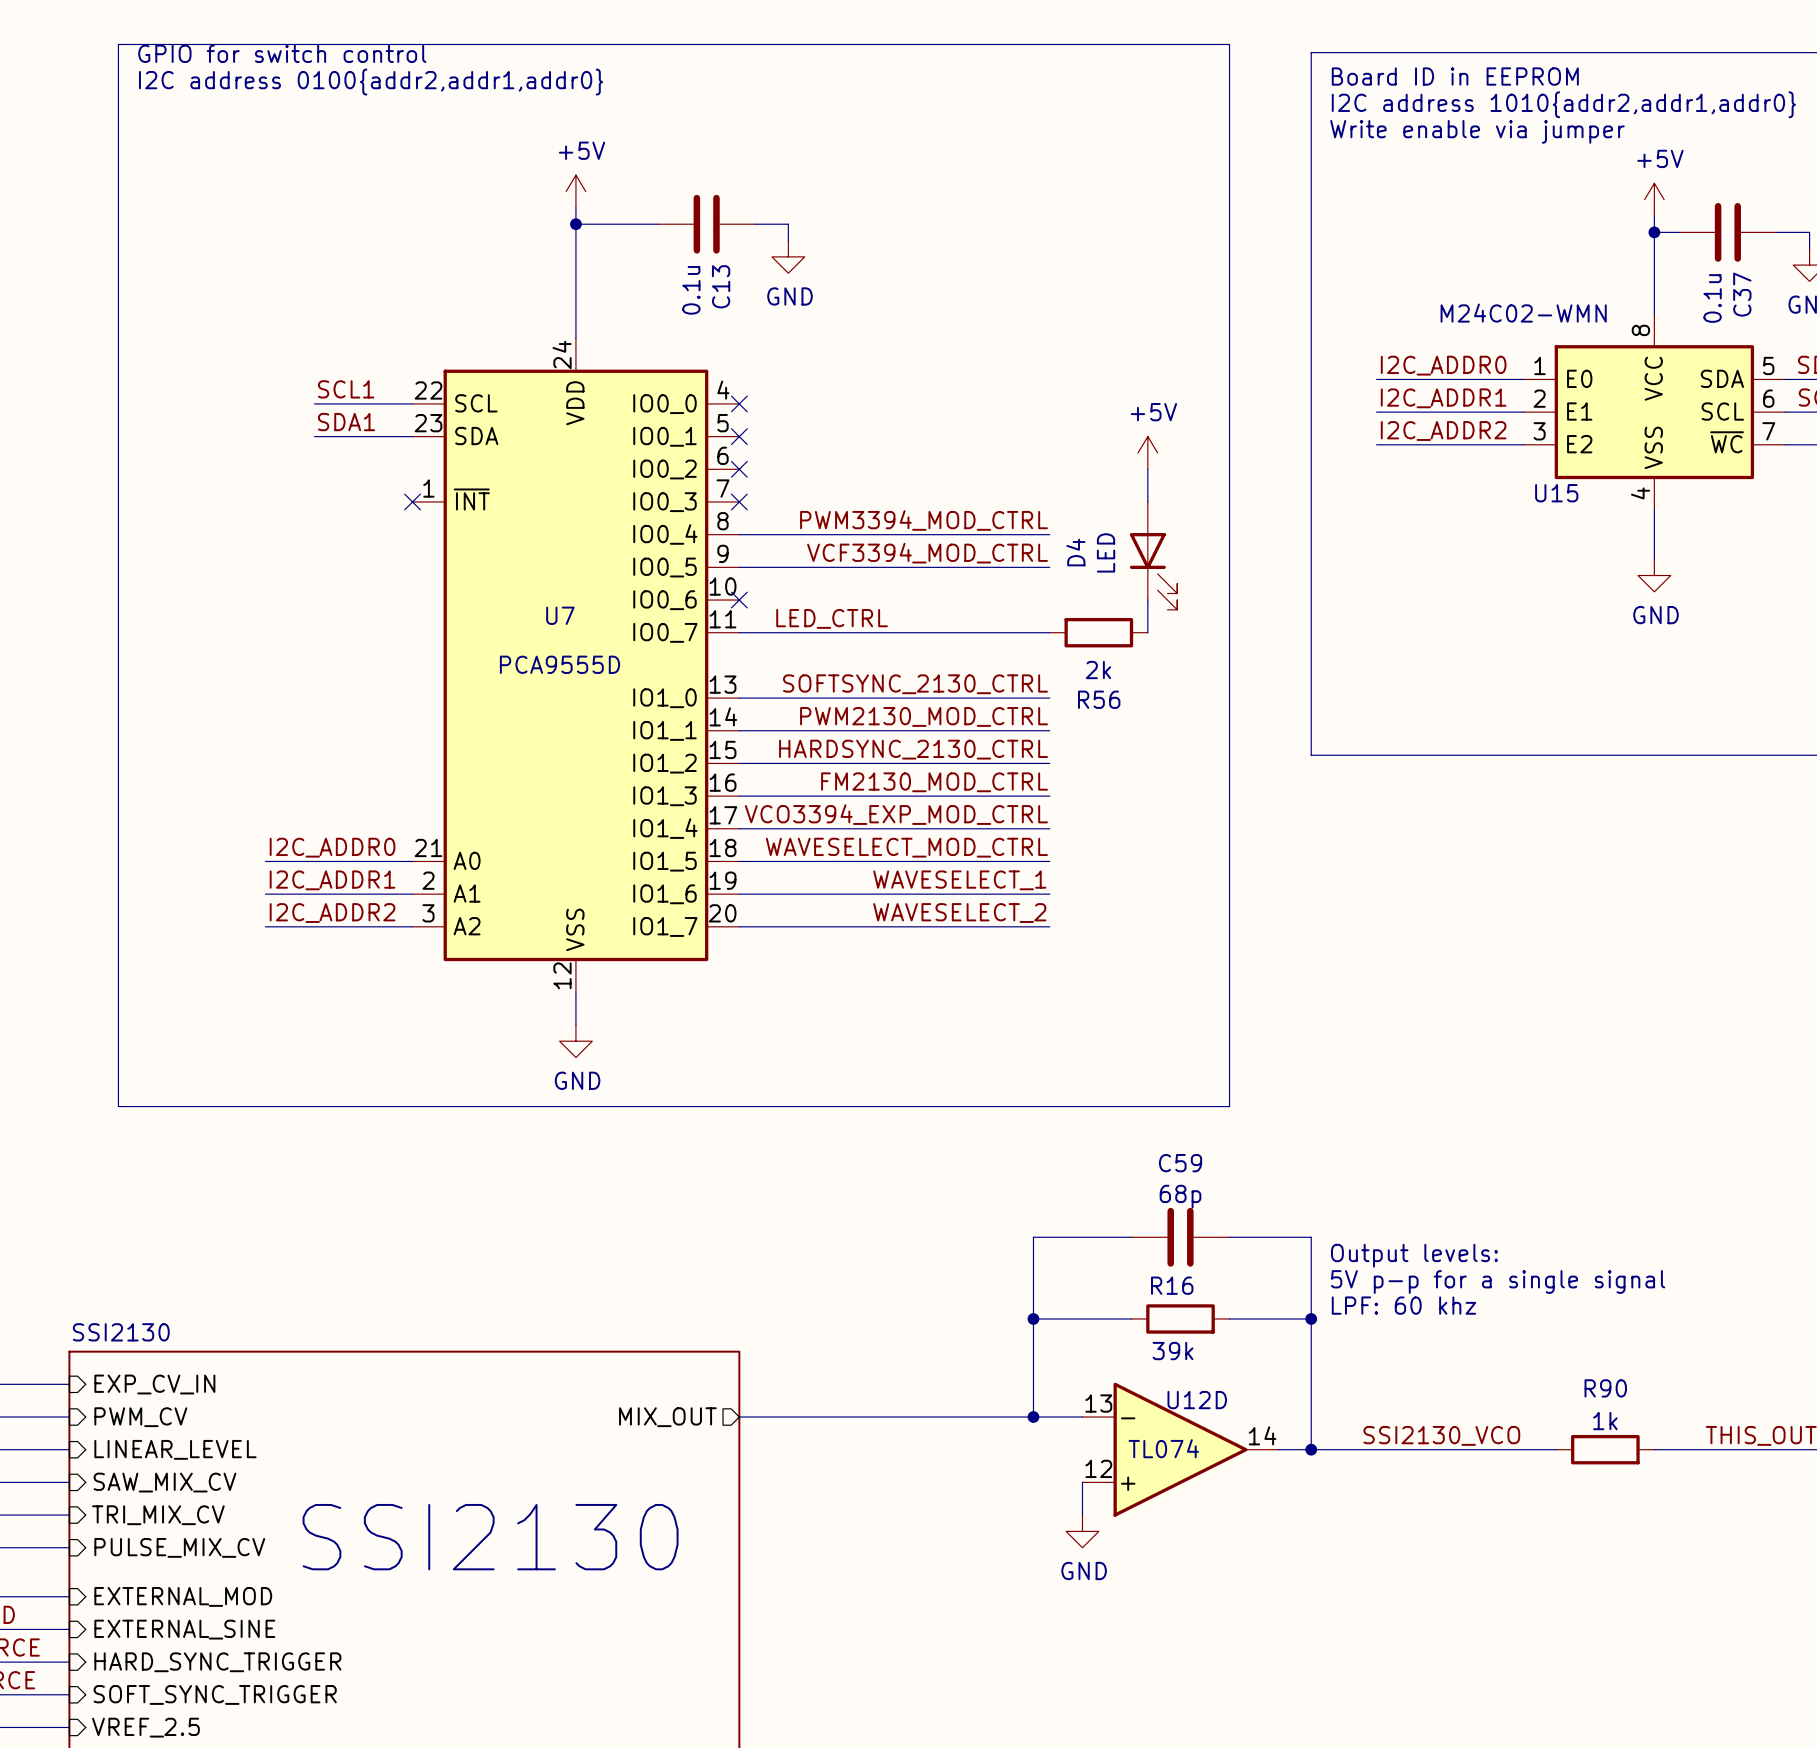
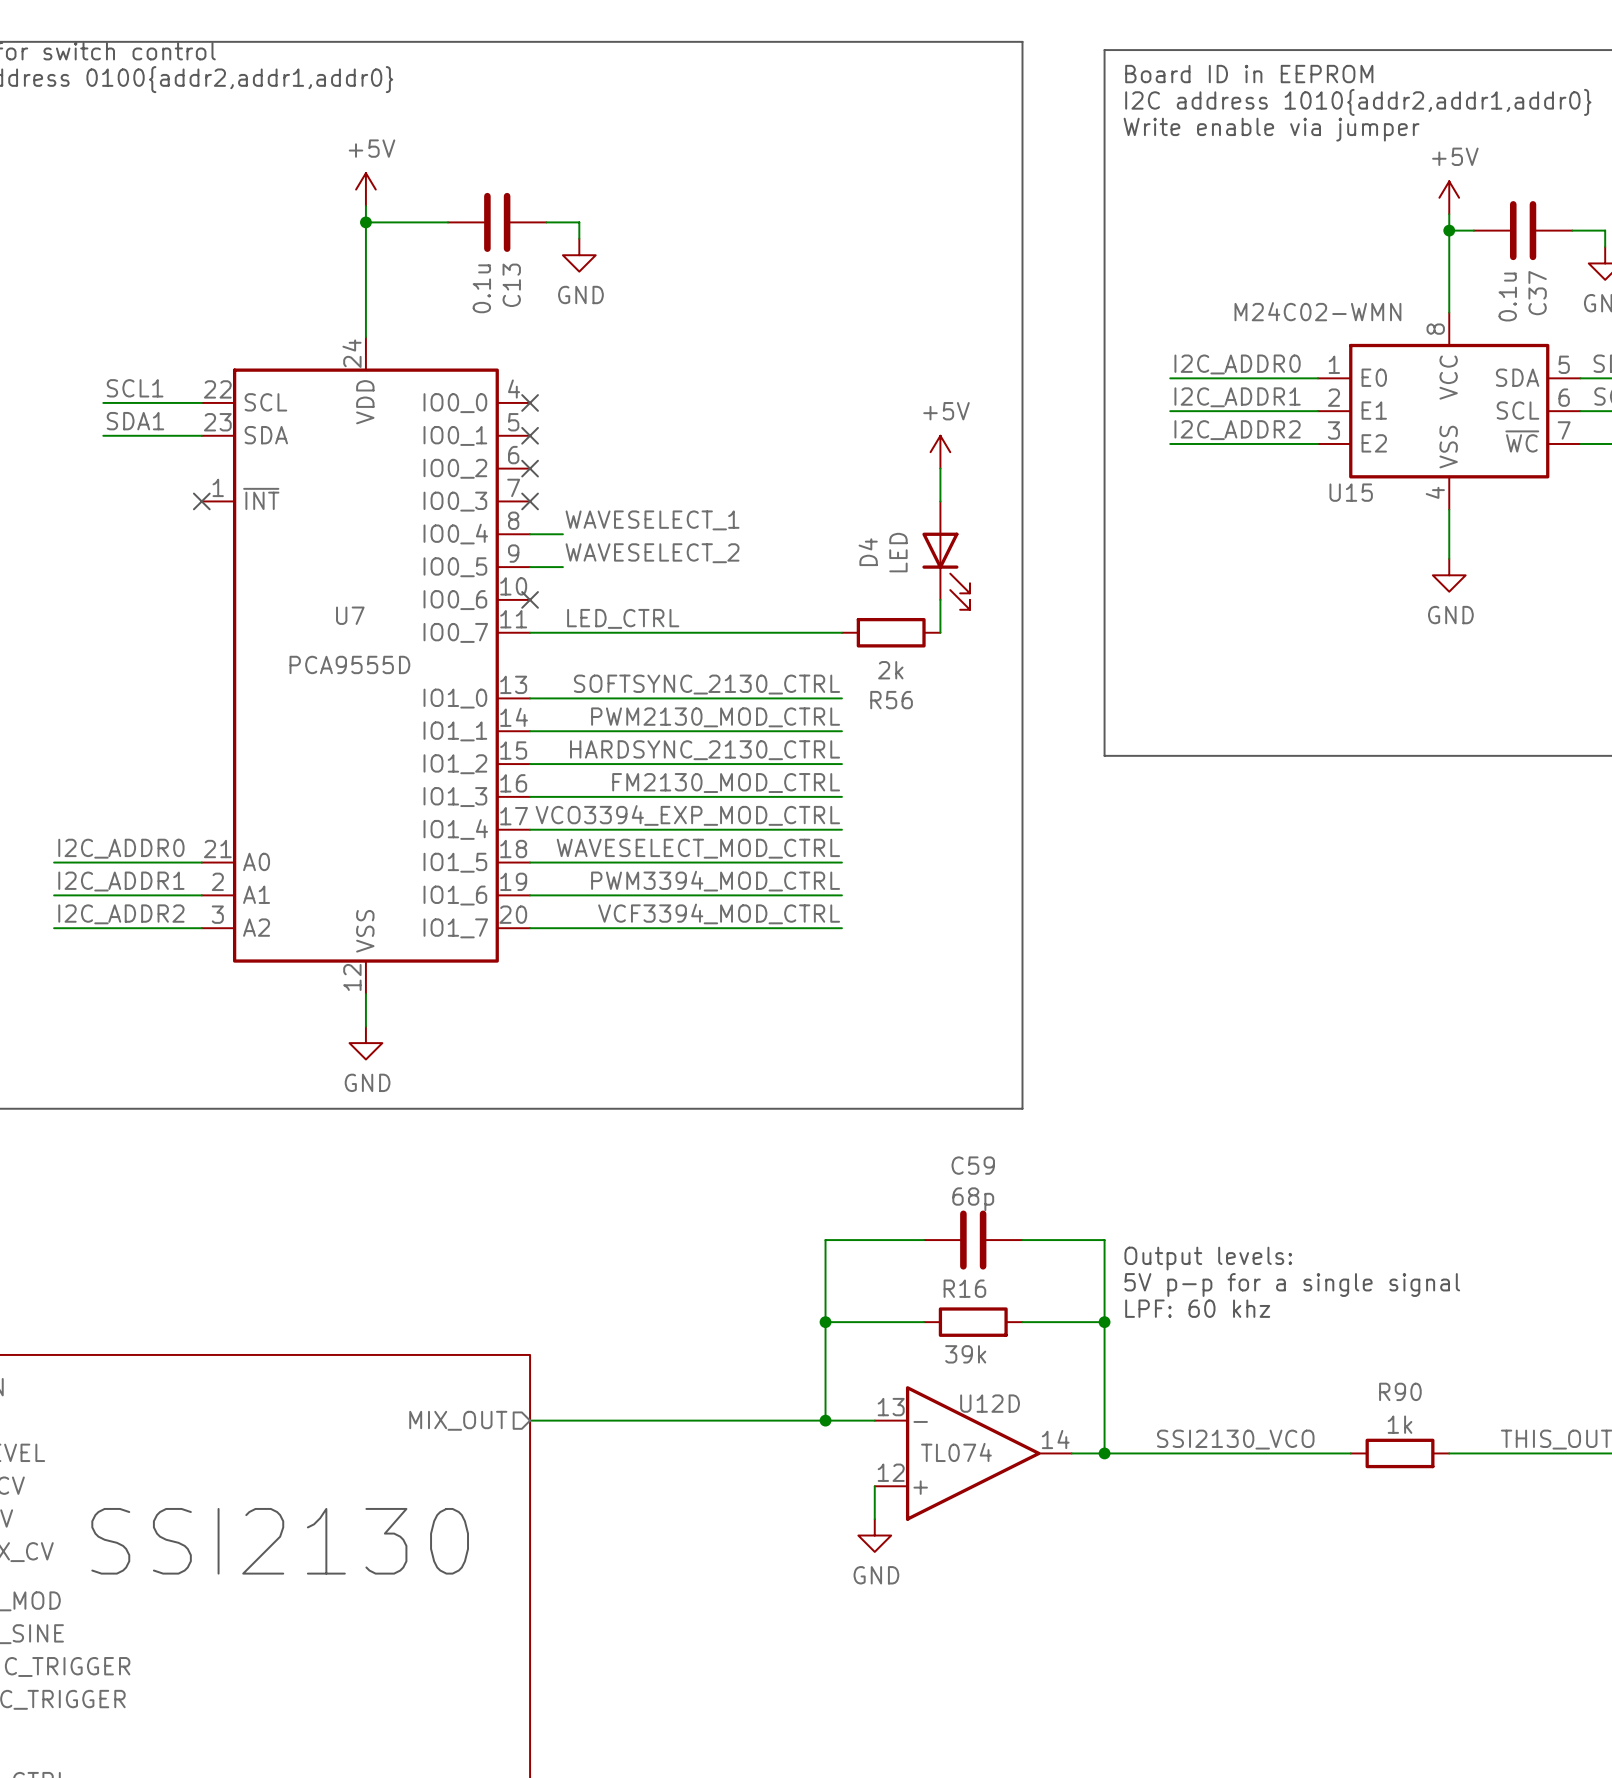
label: none -> WAVESELECT_1 (652, 520)
label: PWM3394_MOD_CTRL (924, 520) -> none
wire: (772, 534) (1049, 534) -> none
label: none -> WAVESELECT_2 (652, 553)
label: VCF3394_MOD_CTRL (927, 553) -> none
wire: (772, 567) (1049, 567) -> none
label: WAVESELECT_1 (959, 880) -> PWM3394_MOD_CTRL (715, 881)
label: WAVESELECT_2 (959, 913) -> VCF3394_MOD_CTRL (719, 913)

